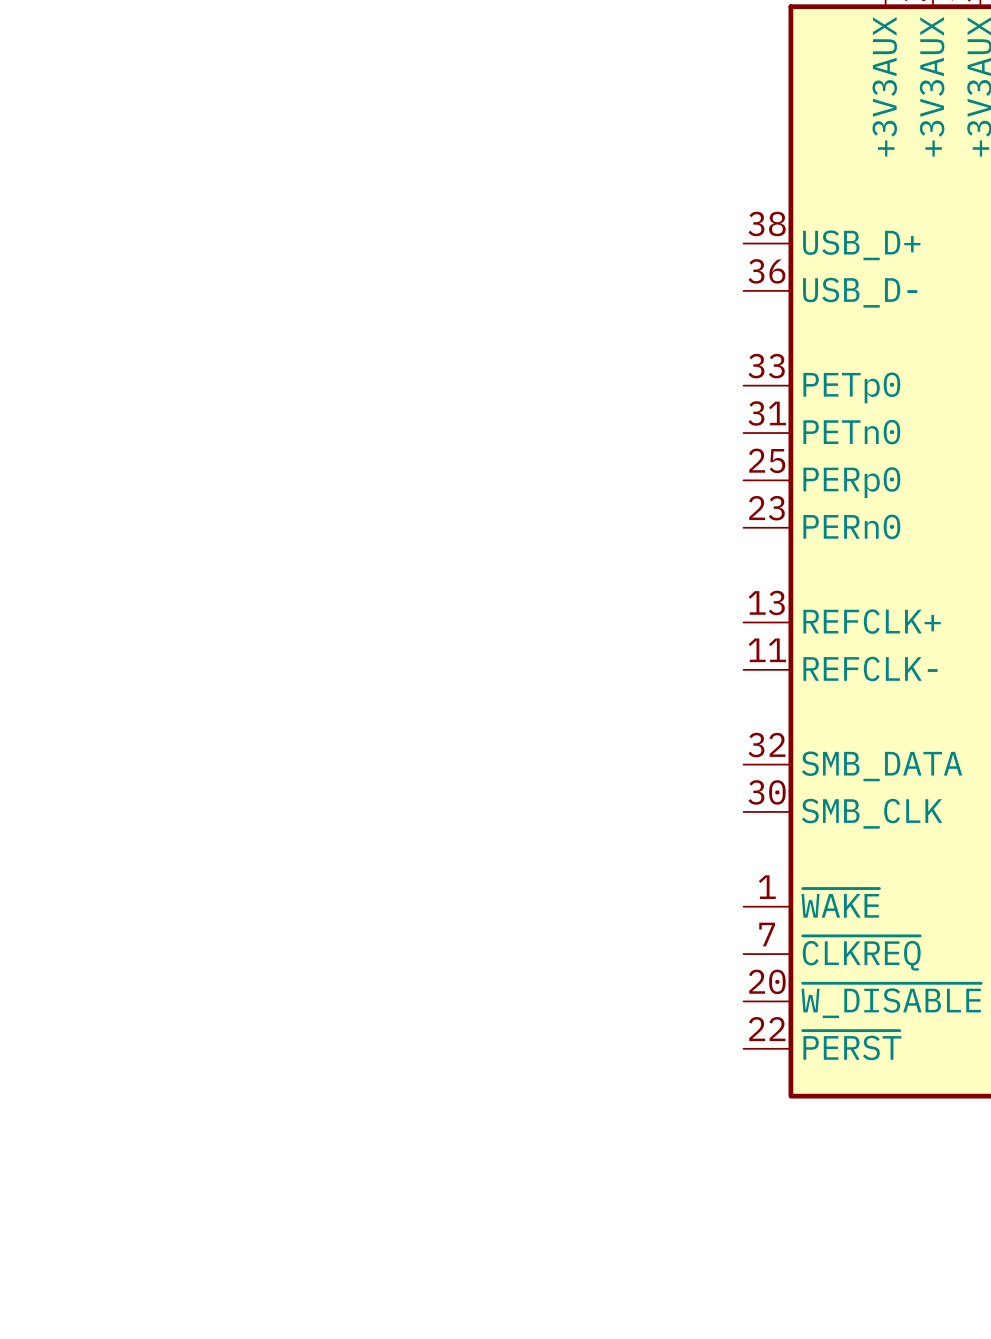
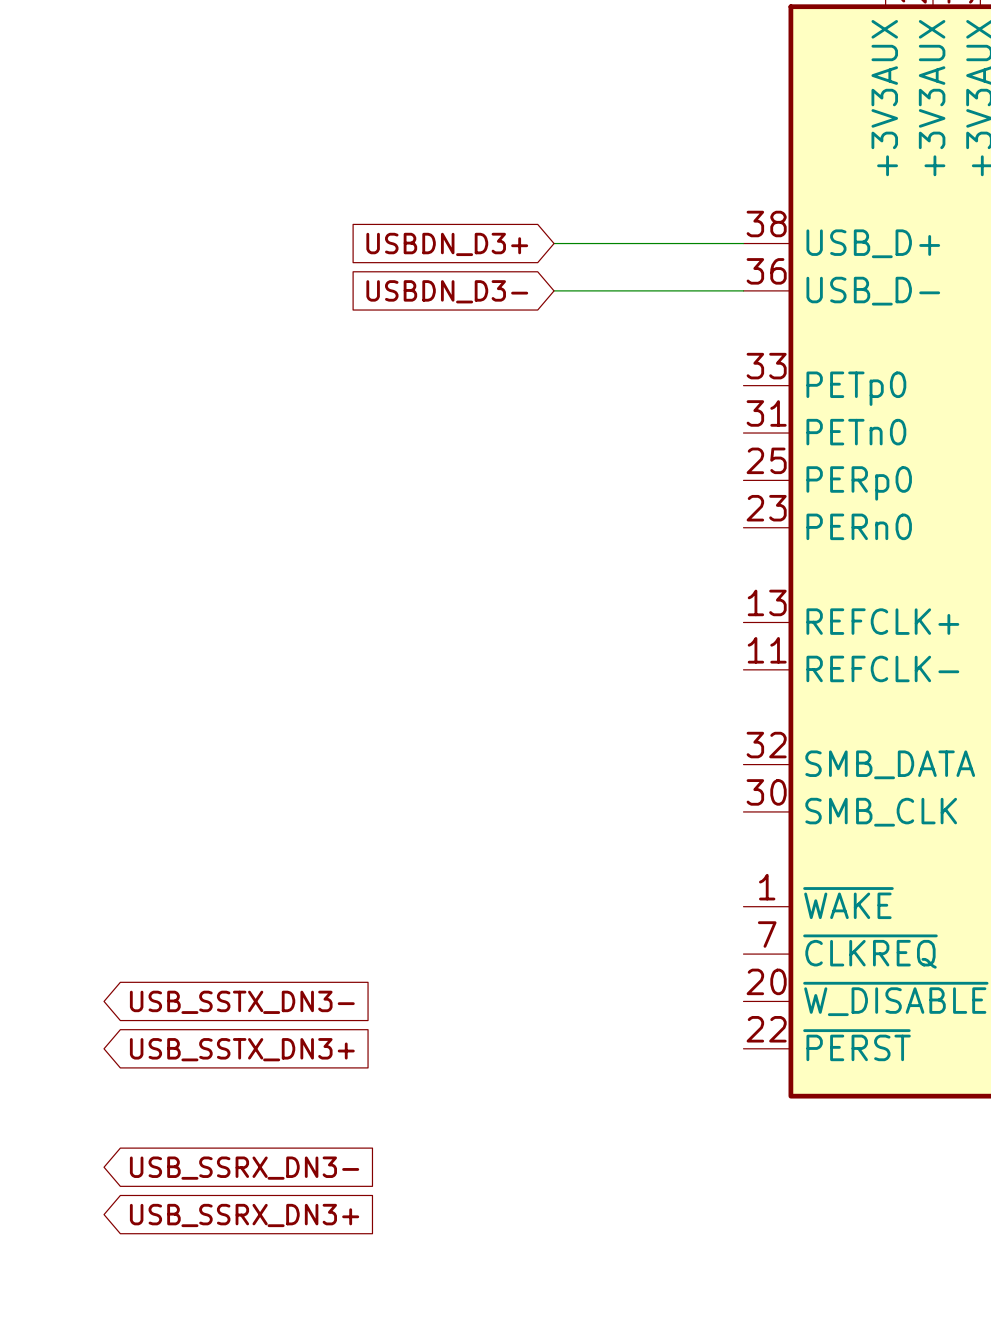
wire: none -> (554, 243) (743, 243)
global label: none -> USBDN_D3+ (447, 244)
wire: none -> (554, 290) (743, 290)
global label: none -> USBDN_D3- (447, 291)
global label: none -> USB_SSTX_DN3- (242, 1002)
global label: none -> USB_SSTX_DN3+ (242, 1049)
global label: none -> USB_SSRX_DN3- (244, 1168)
global label: none -> USB_SSRX_DN3+ (244, 1215)

